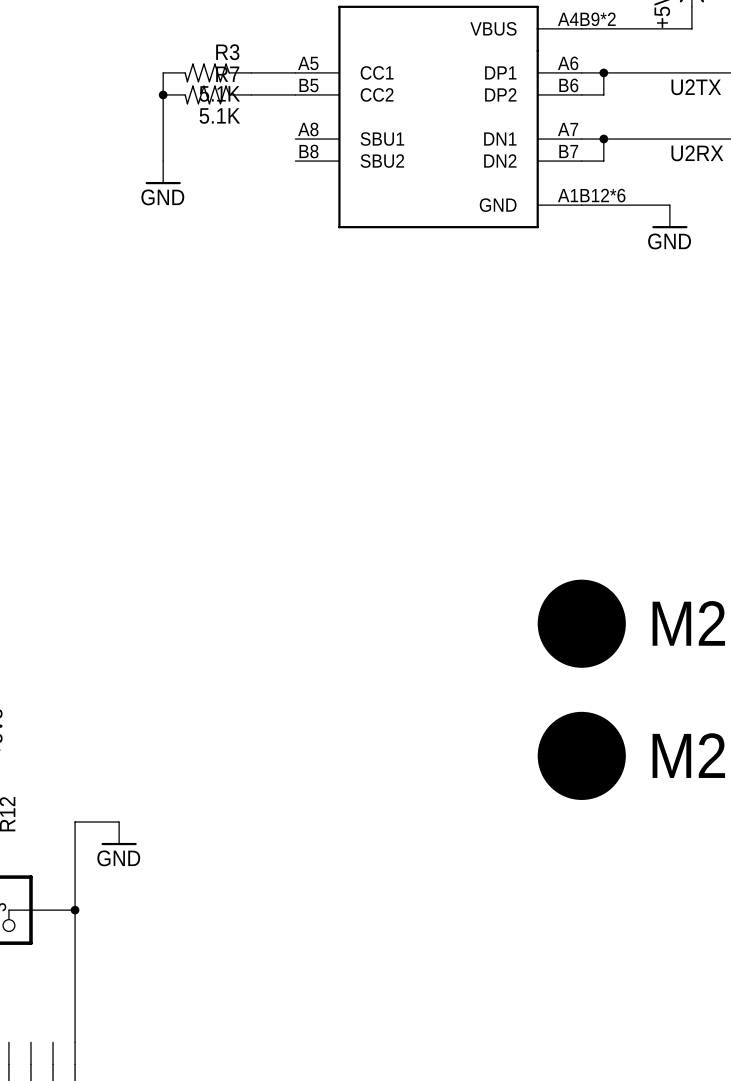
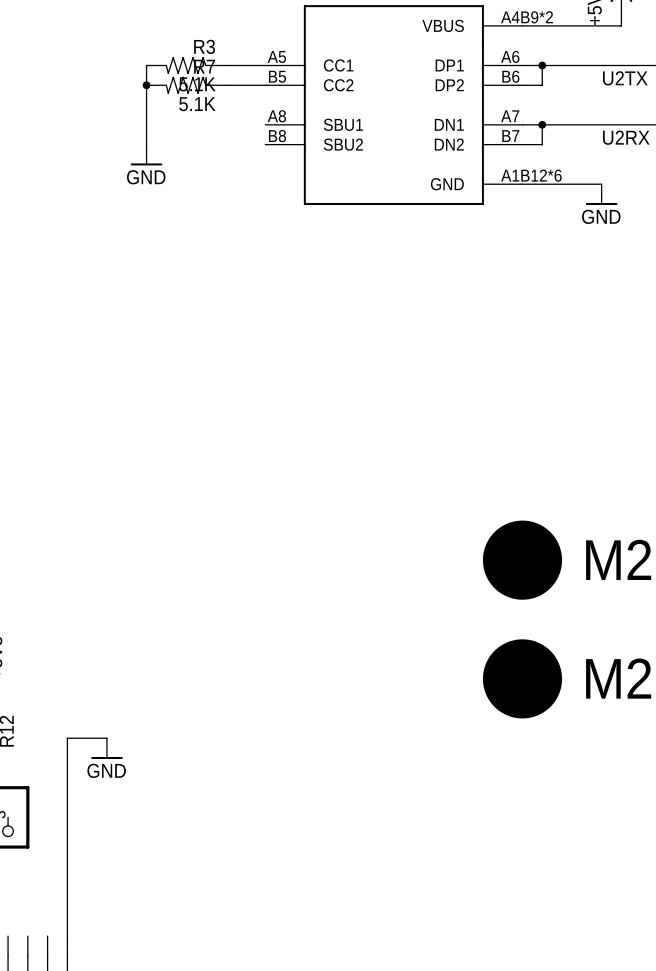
wire: (8, 910) (75, 910) -> none
junction: (75, 910) -> none

